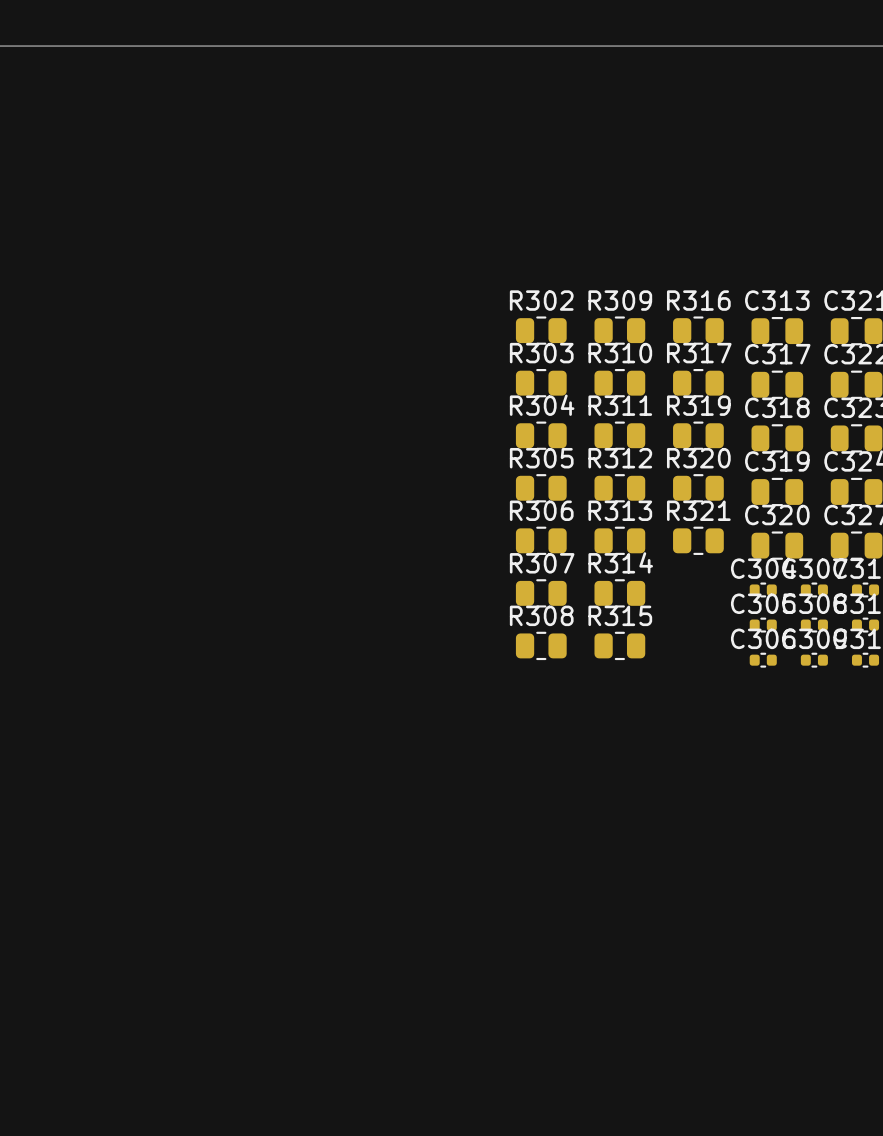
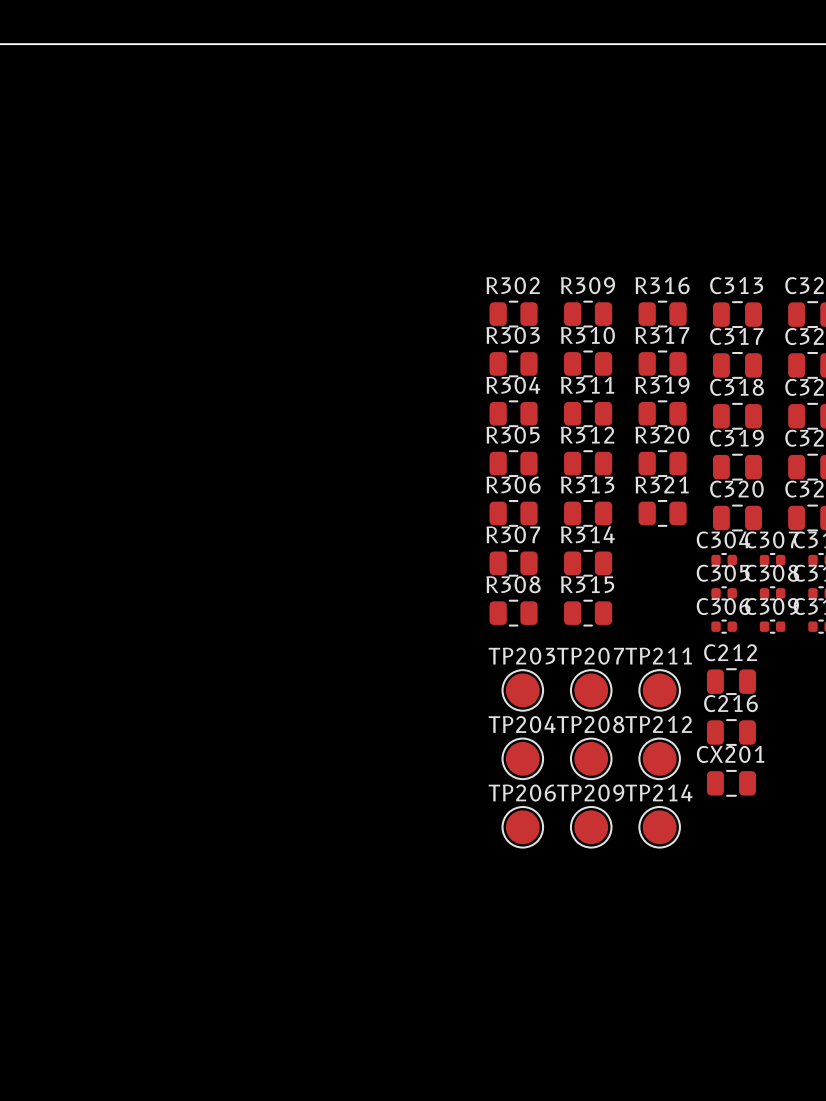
C212: none -> (731, 681)
TP203: none -> (522, 690)
TP207: none -> (591, 690)
TP211: none -> (659, 690)
C216: none -> (731, 732)
TP204: none -> (522, 758)
TP208: none -> (591, 758)
TP212: none -> (659, 758)
CX201: none -> (731, 783)
TP206: none -> (522, 827)
TP209: none -> (591, 827)
TP214: none -> (659, 827)

